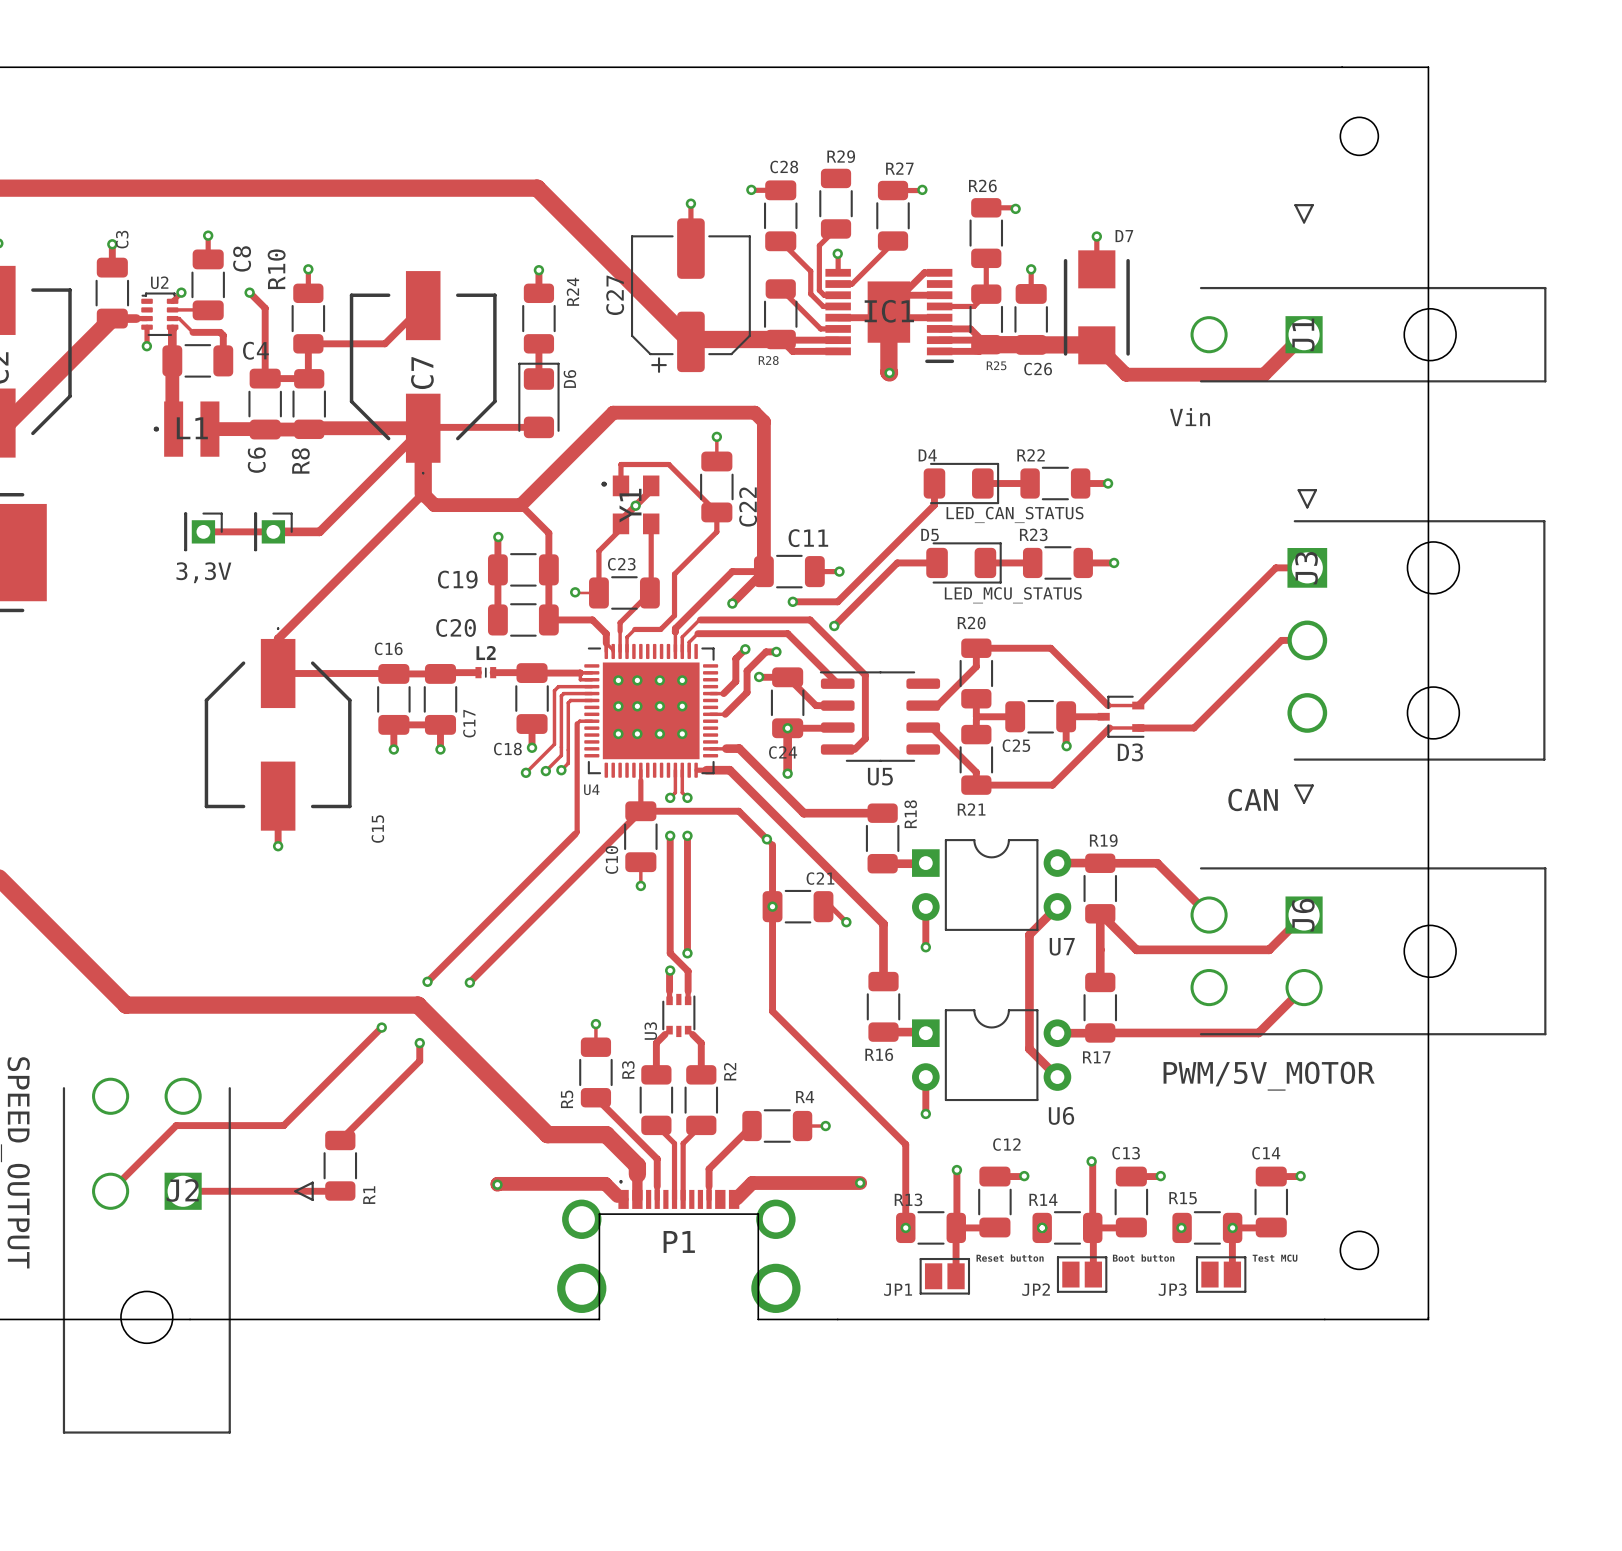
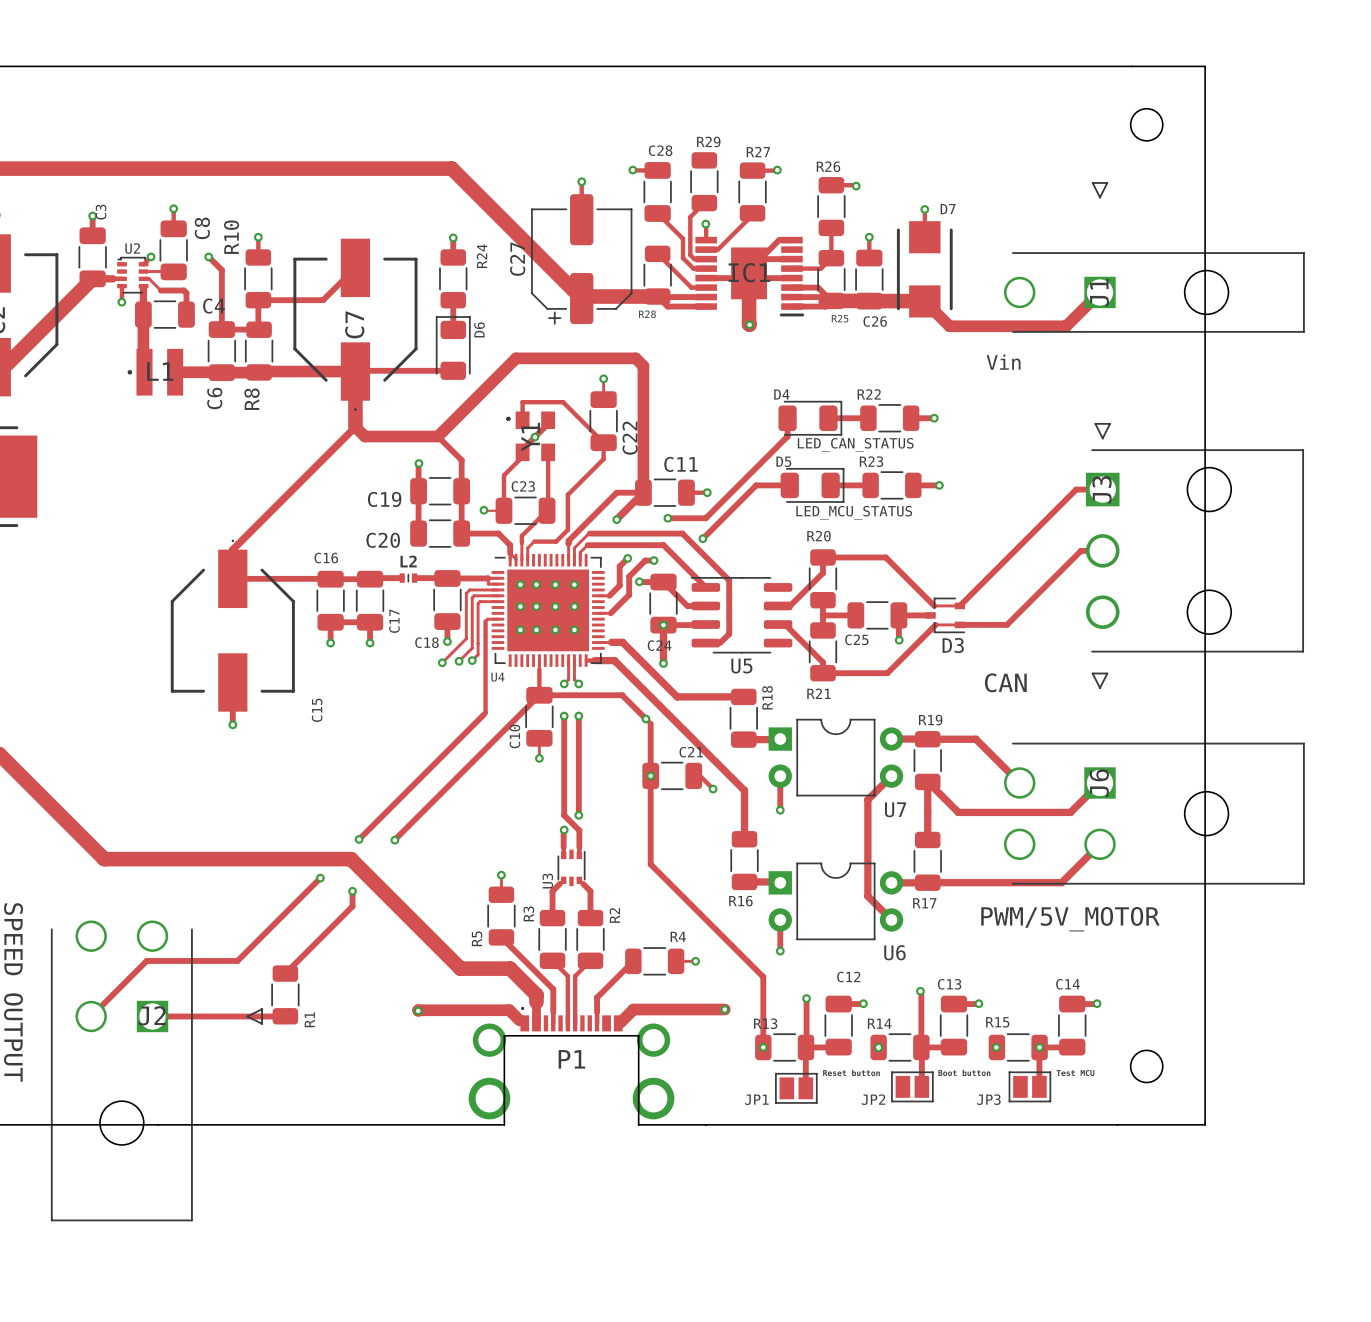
track: (423, 428) (319, 531) (203, 531) -> none
part: (203, 531) -> none
part: (273, 531) -> none
text: 3,3V (203, 572) -> none
text position: CAN (1253, 799) -> CAN (1005, 682)

